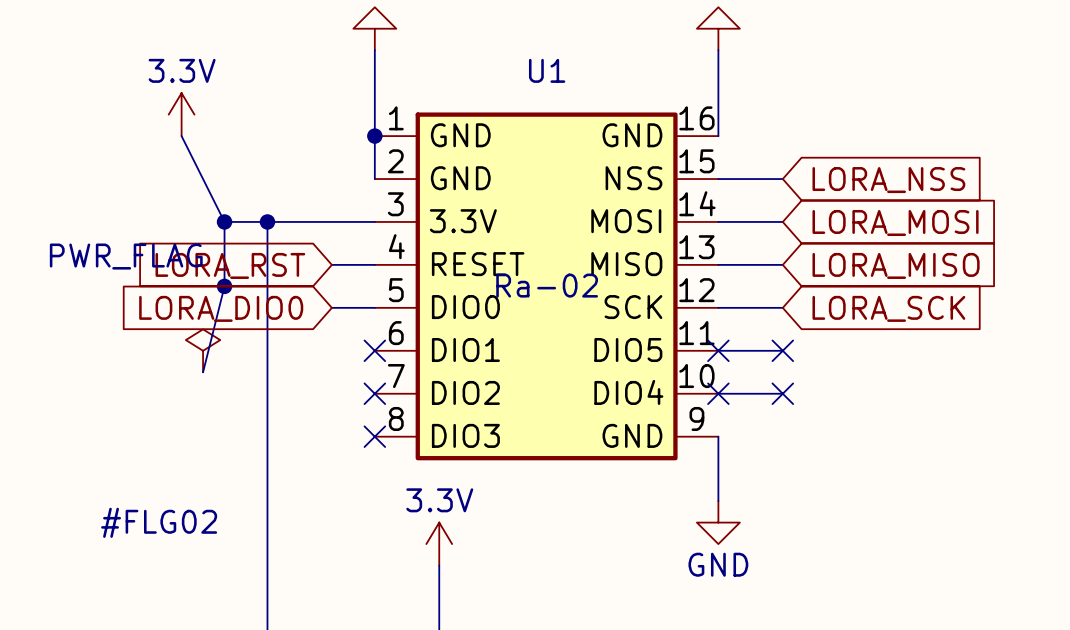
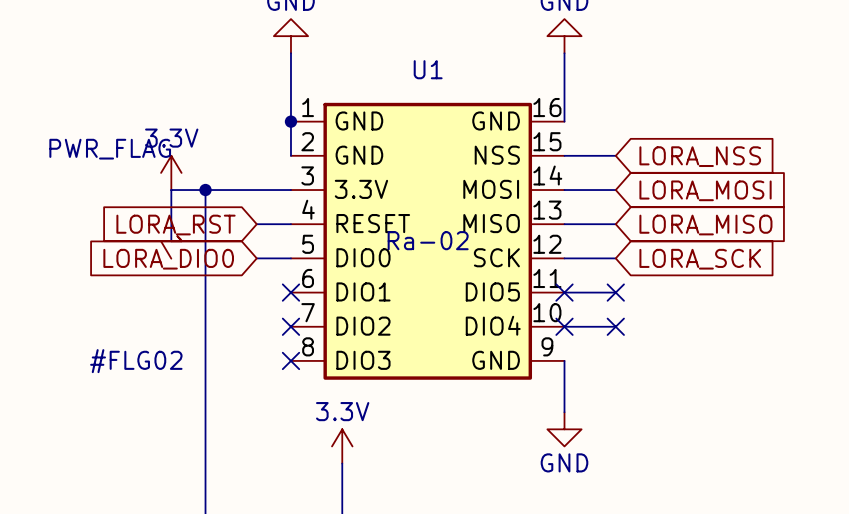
power symbol position: 3.3V (181, 114) -> 3.3V (171, 172)
wire: (181, 136) (224, 221) -> none
junction: (224, 221) -> none
wire: (224, 286) (203, 372) -> none
junction: (224, 286) -> none
#FLG02 shape: [185, 329, 221, 373] -> [161, 235, 183, 259]

